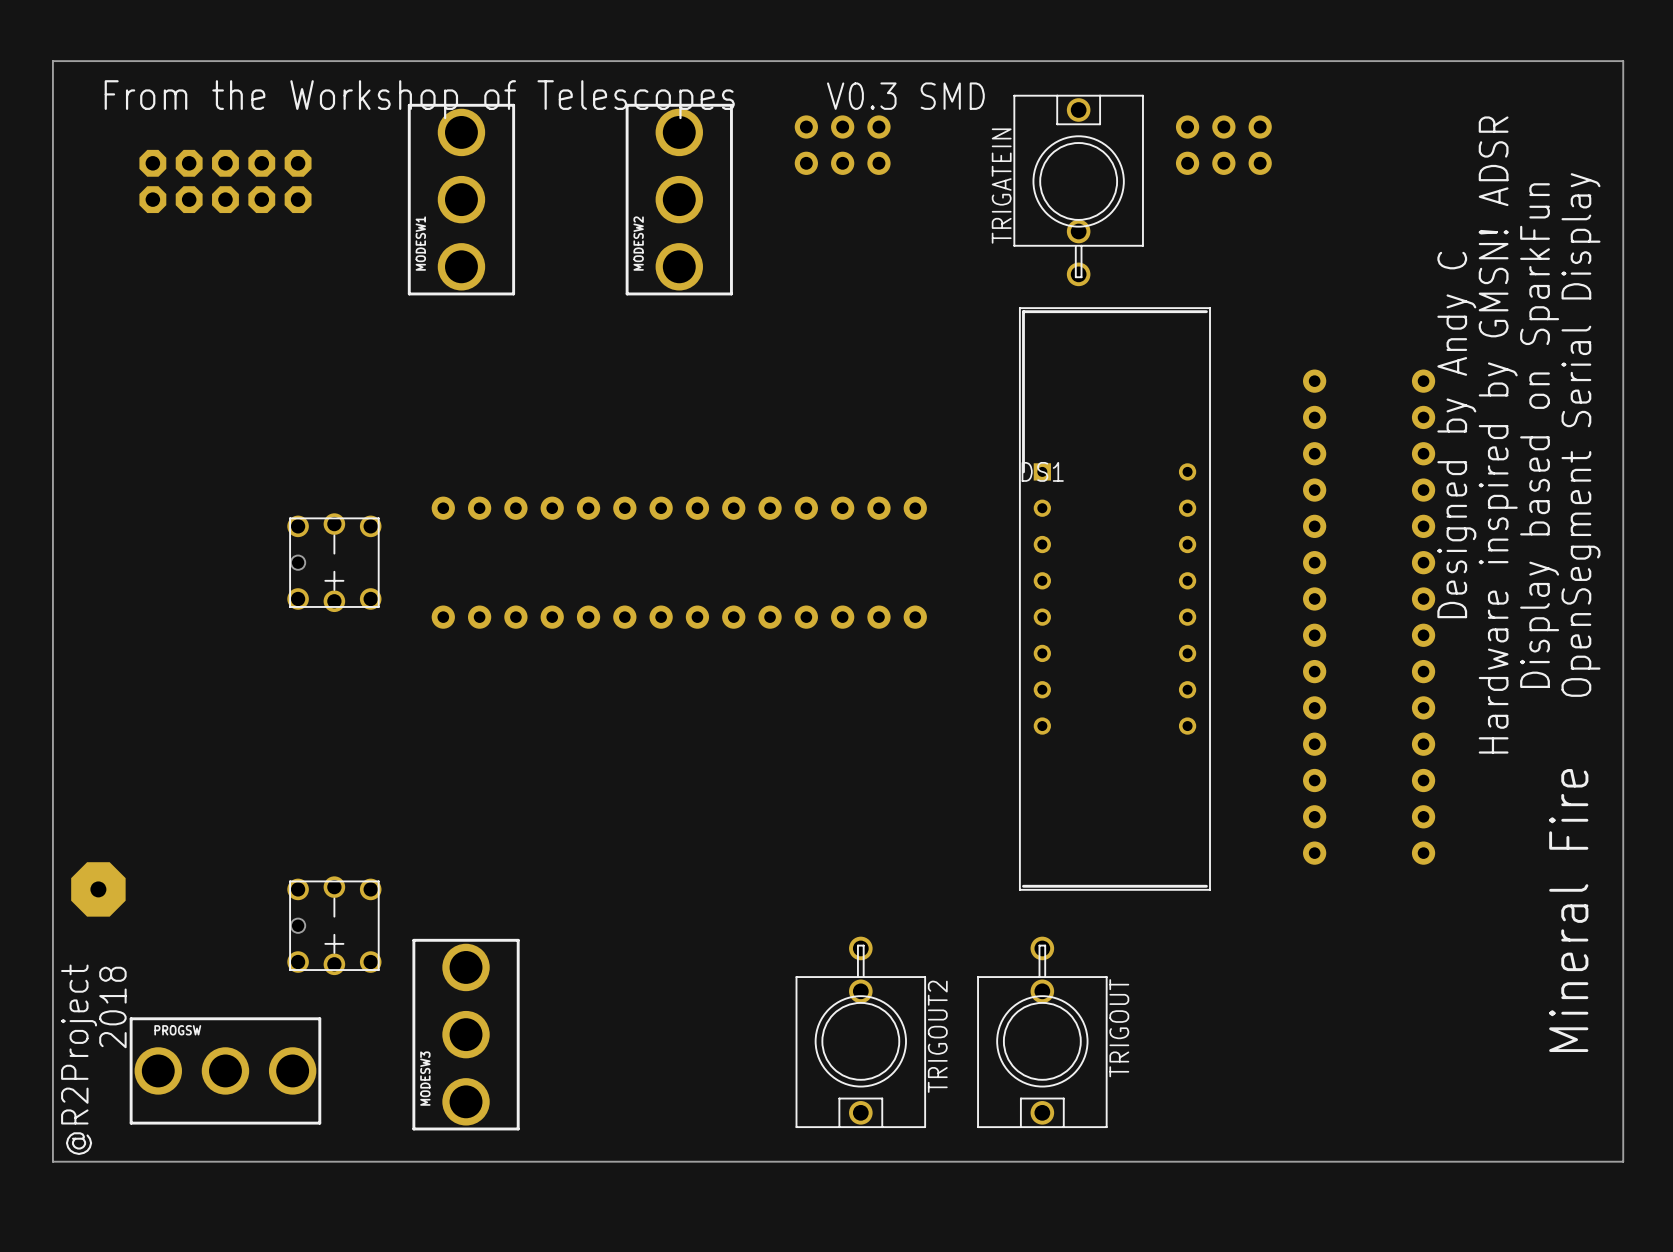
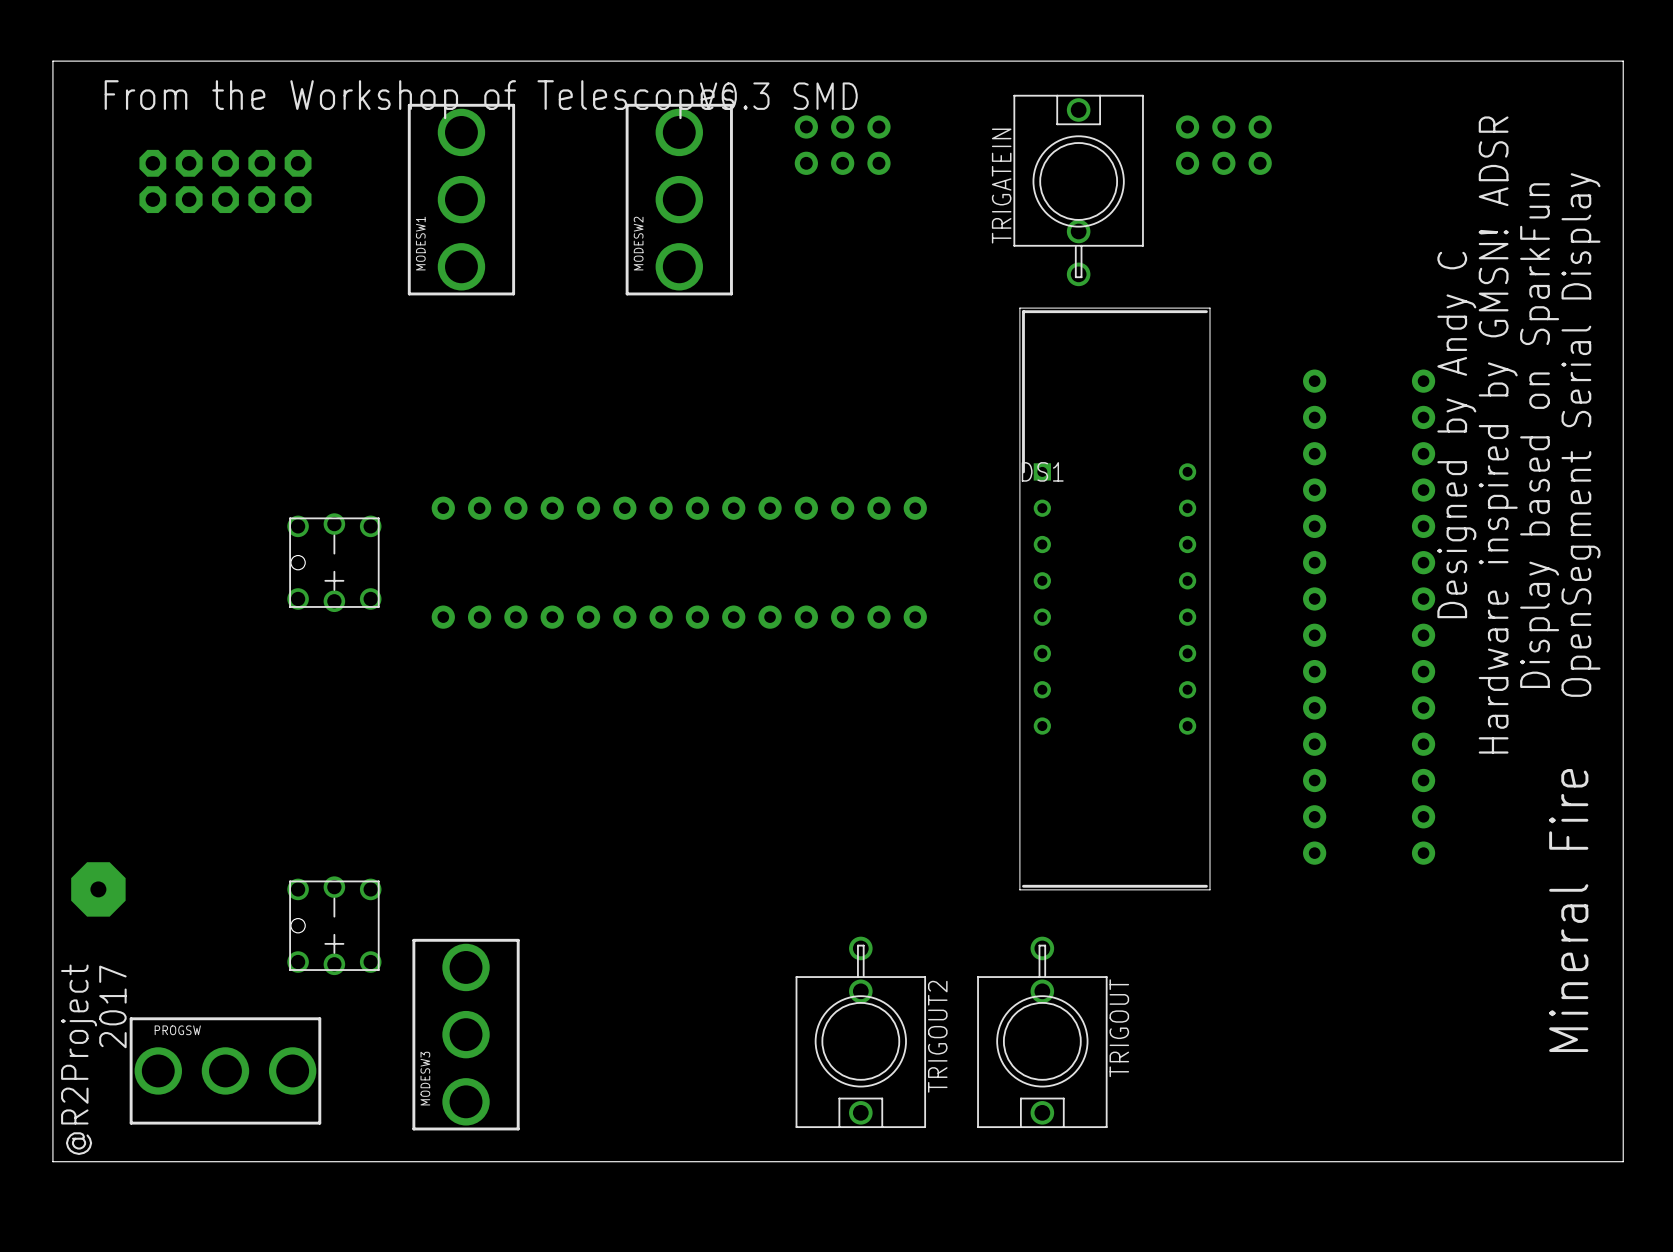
text position: V0.3 SMD (905, 96) -> V0.3 SMD (778, 96)
text: 2018 (112, 1007) -> 2017 (112, 1006)

